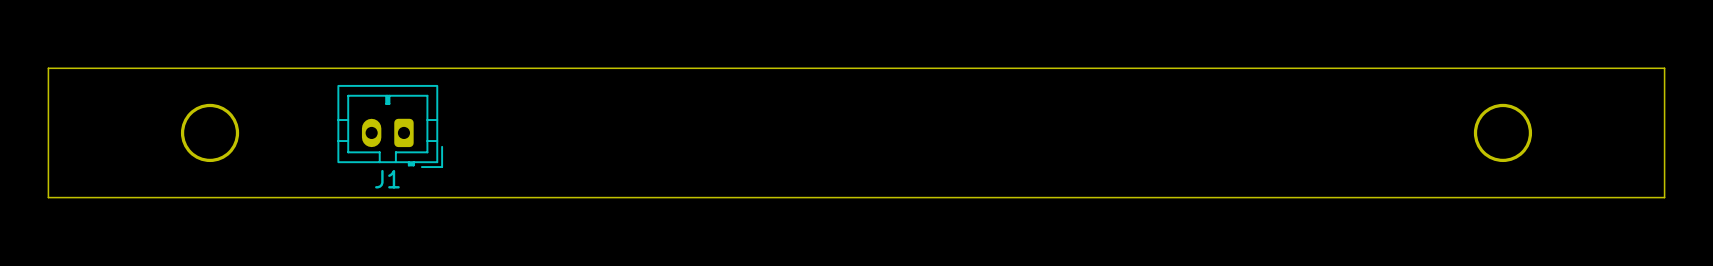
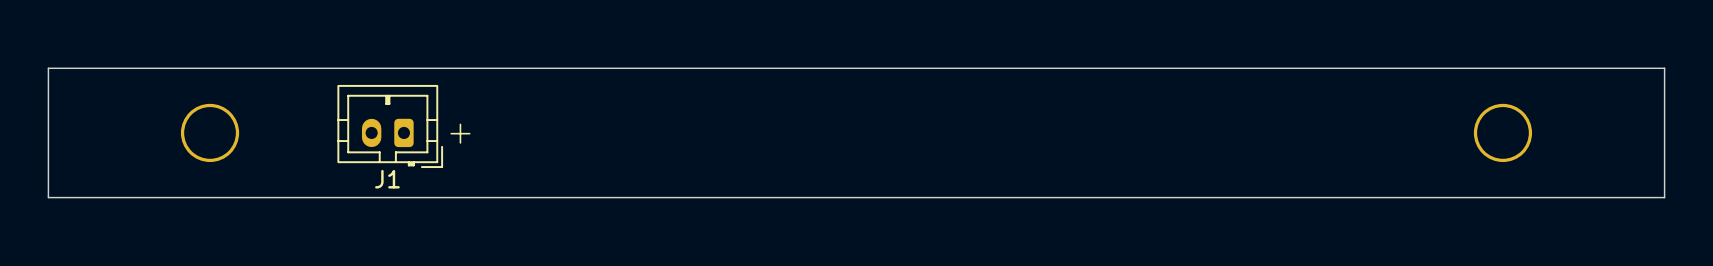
text: none -> + (460, 133)

